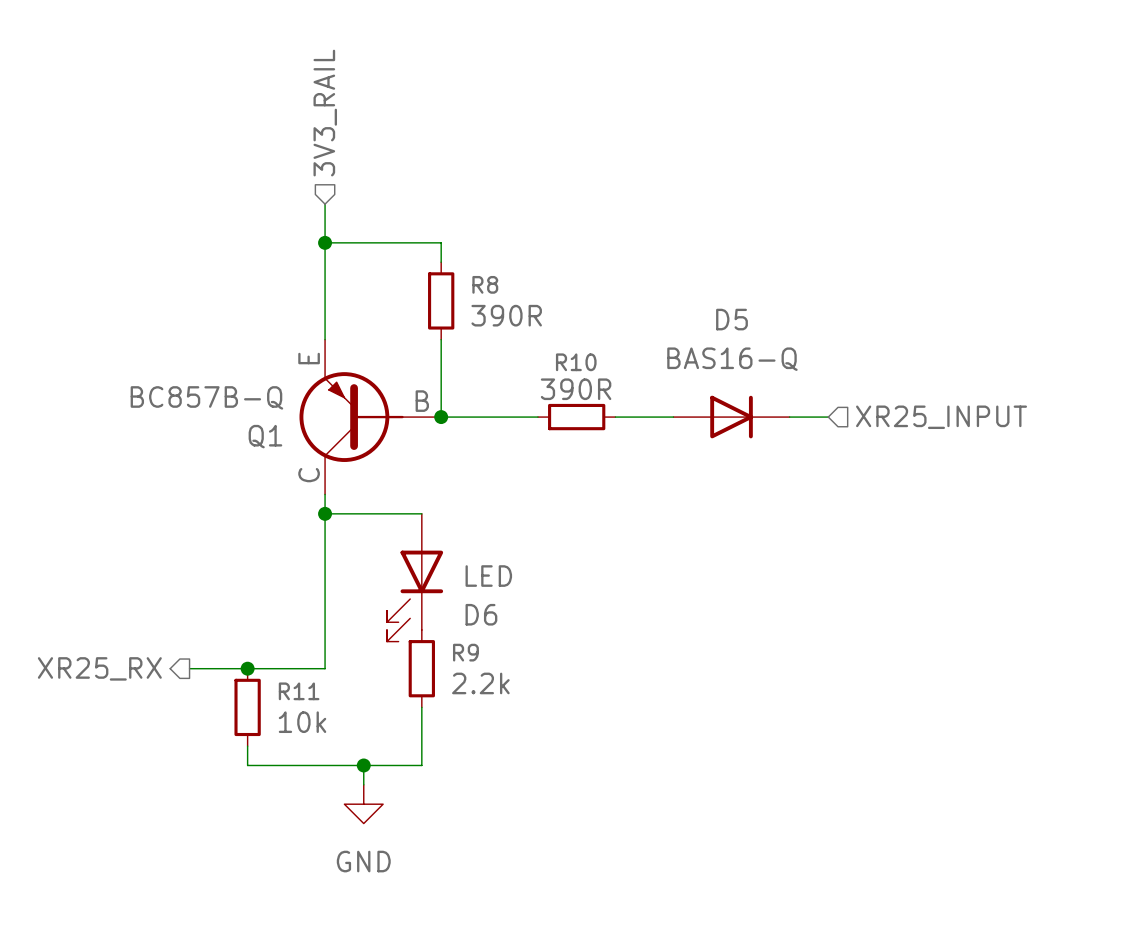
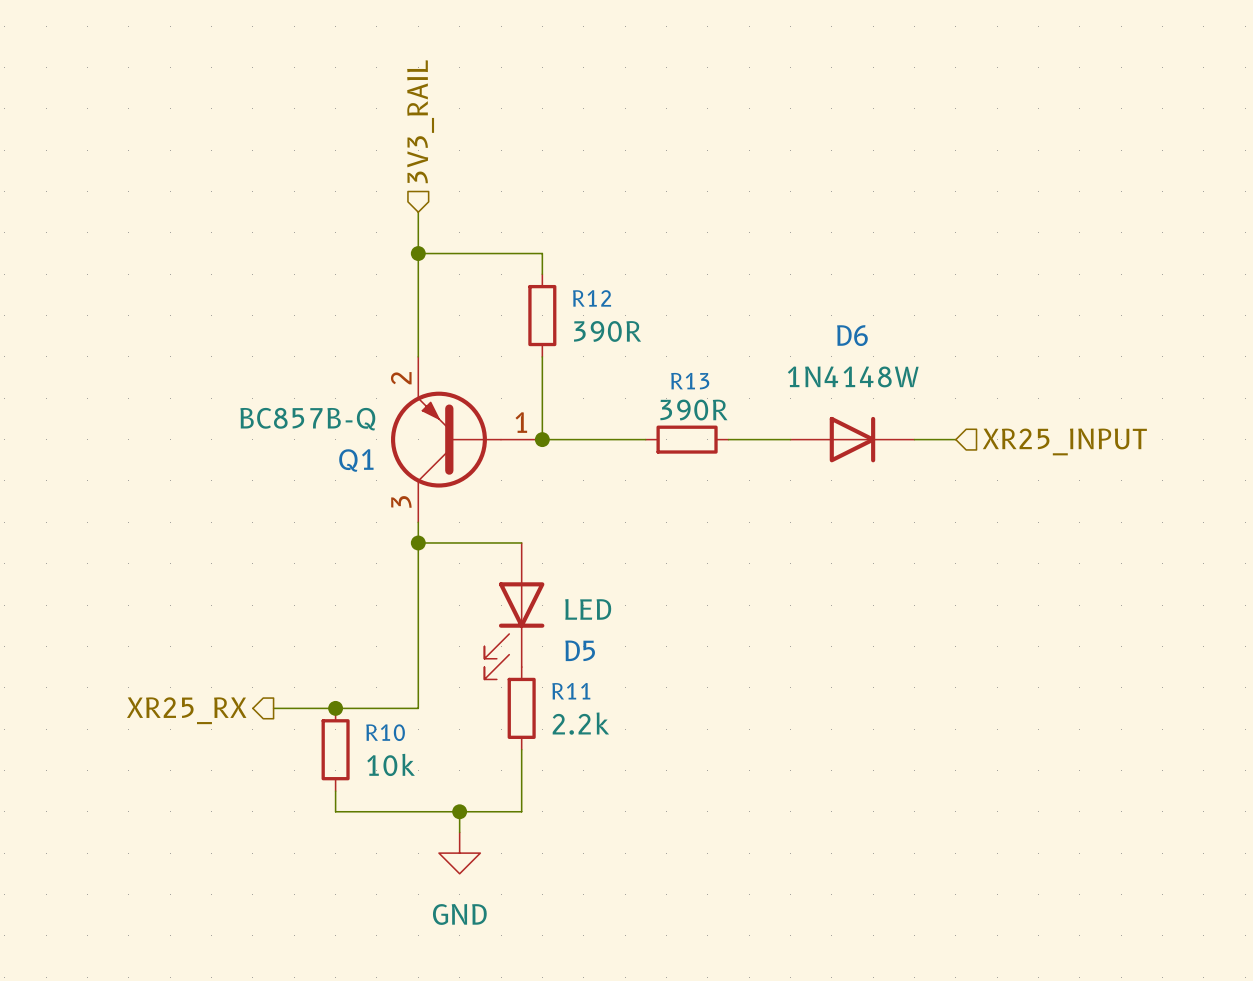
R8 name: R8 (485, 284) -> R12 (592, 298)
D5 name: D5 (731, 319) -> D6 (852, 335)
Q1 symbol: [299, 339, 442, 495] -> [391, 356, 543, 523]
D5 value: BAS16-Q (732, 359) -> 1N4148W (853, 376)
R10 name: R10 (576, 362) -> R13 (690, 381)
D6 name: D6 (481, 614) -> D5 (580, 650)
R9 name: R9 (465, 652) -> R11 (571, 691)
R11 name: R11 (299, 691) -> R10 (385, 732)

